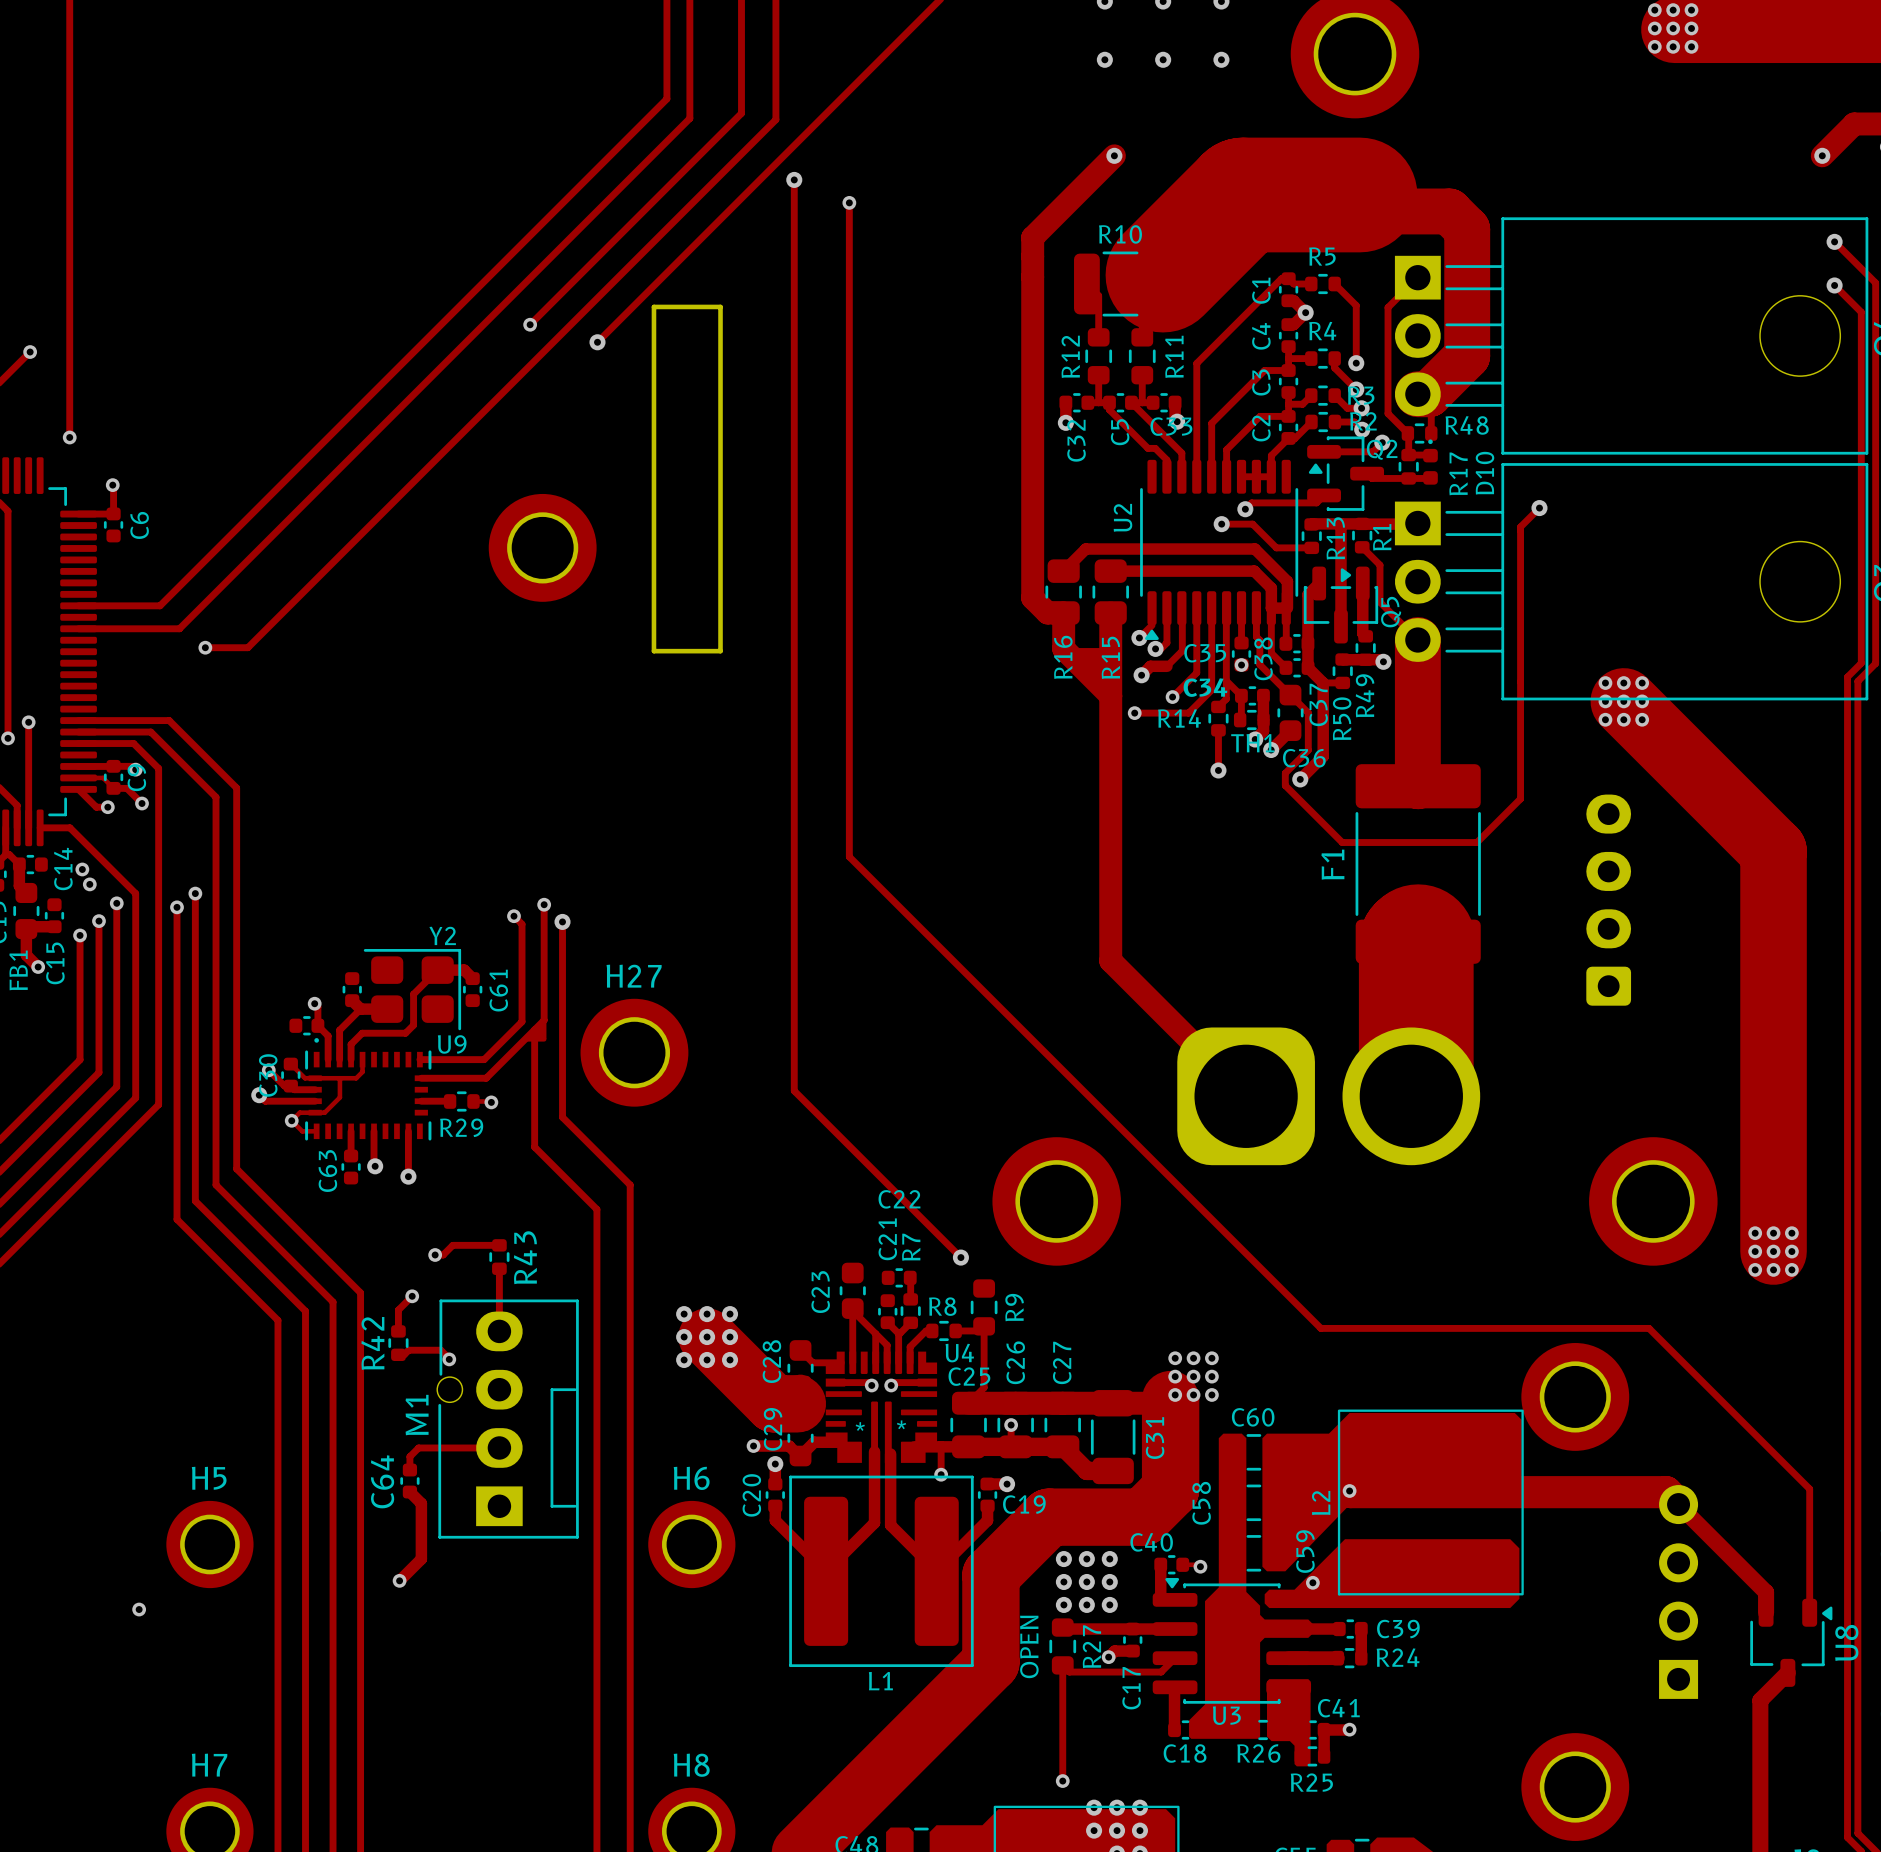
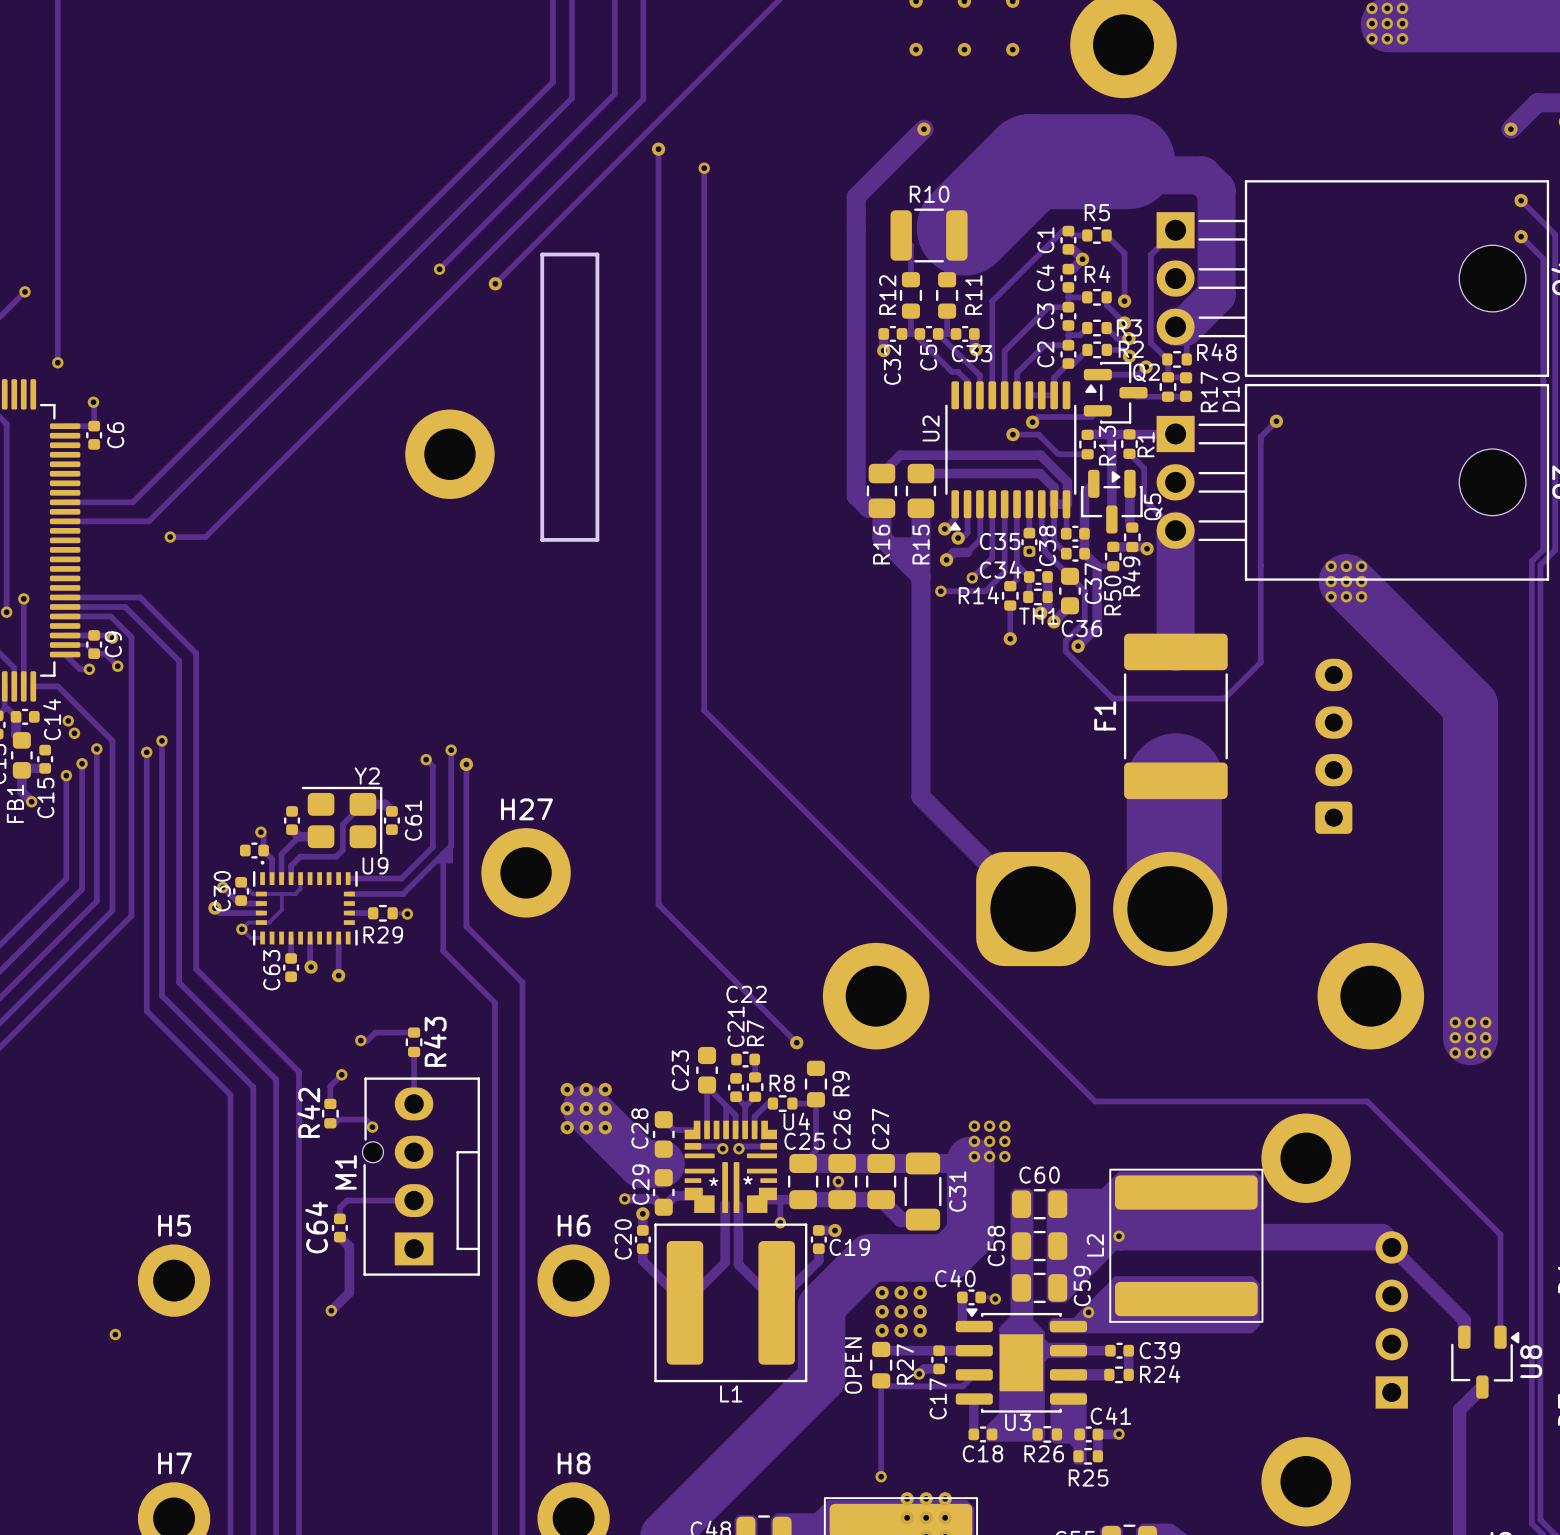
D10 footprint: [1423, 439, 1438, 485] -> [1179, 372, 1193, 402]

